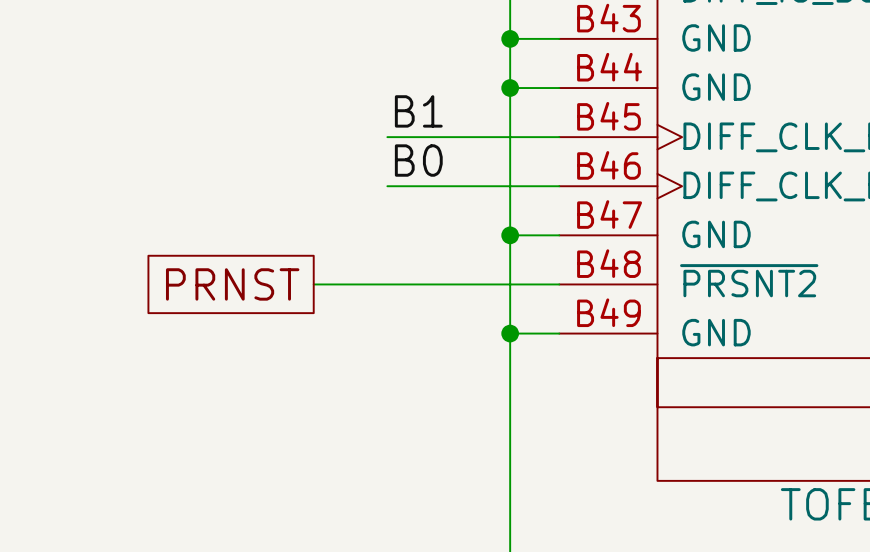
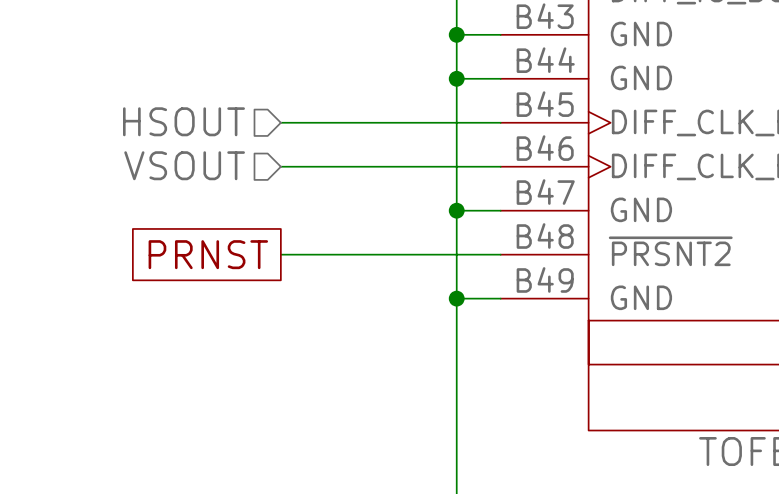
label: B1 (418, 111) -> none
hierarchical label: none -> HSOUT (183, 121)
wire: none -> (280, 122) (346, 122)
label: B0 (418, 160) -> none
hierarchical label: none -> VSOUT (184, 165)
wire: none -> (280, 166) (346, 166)

